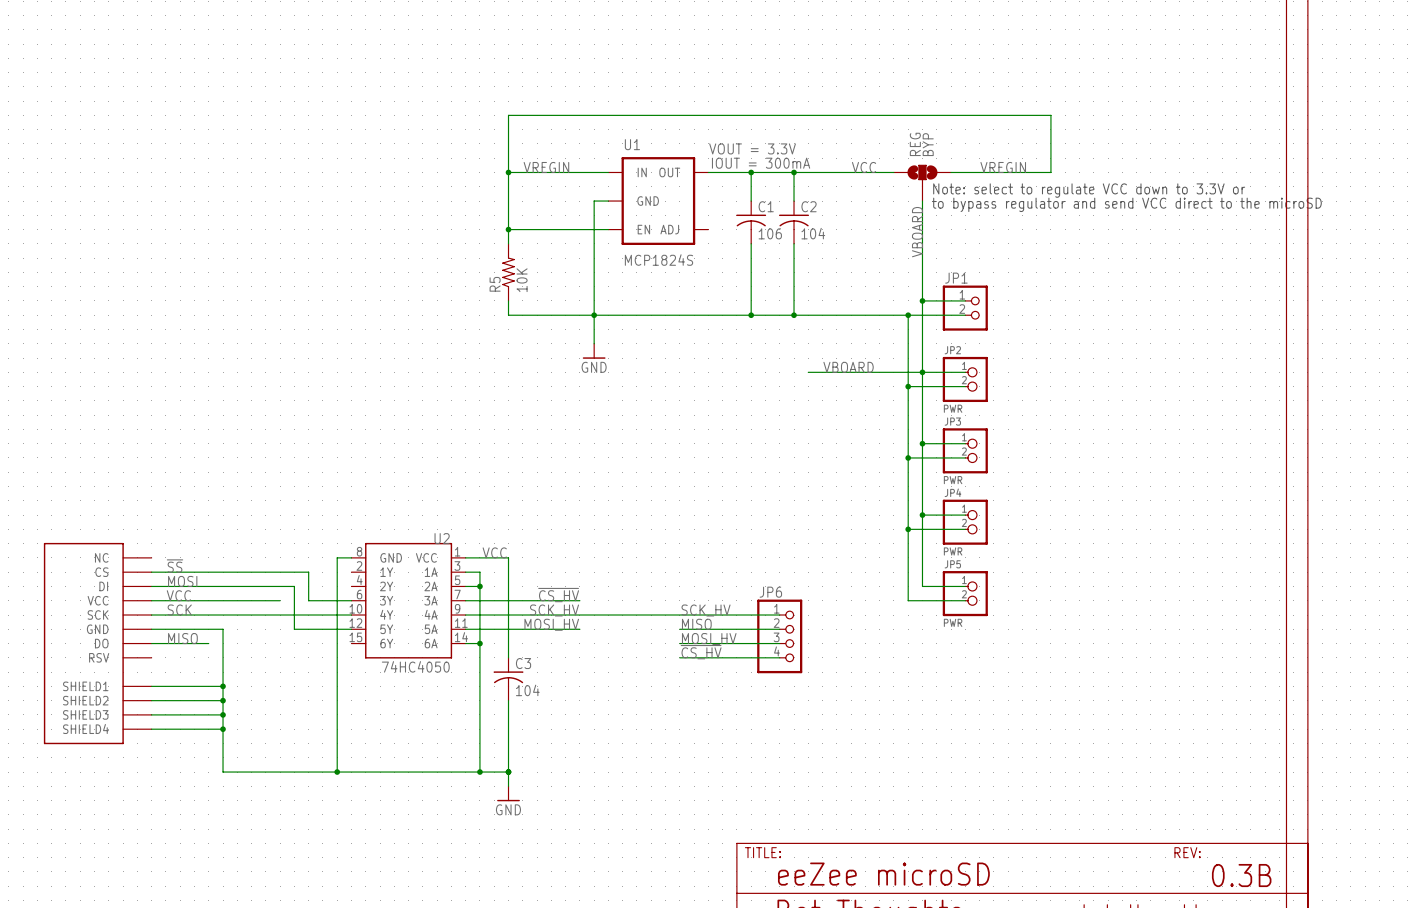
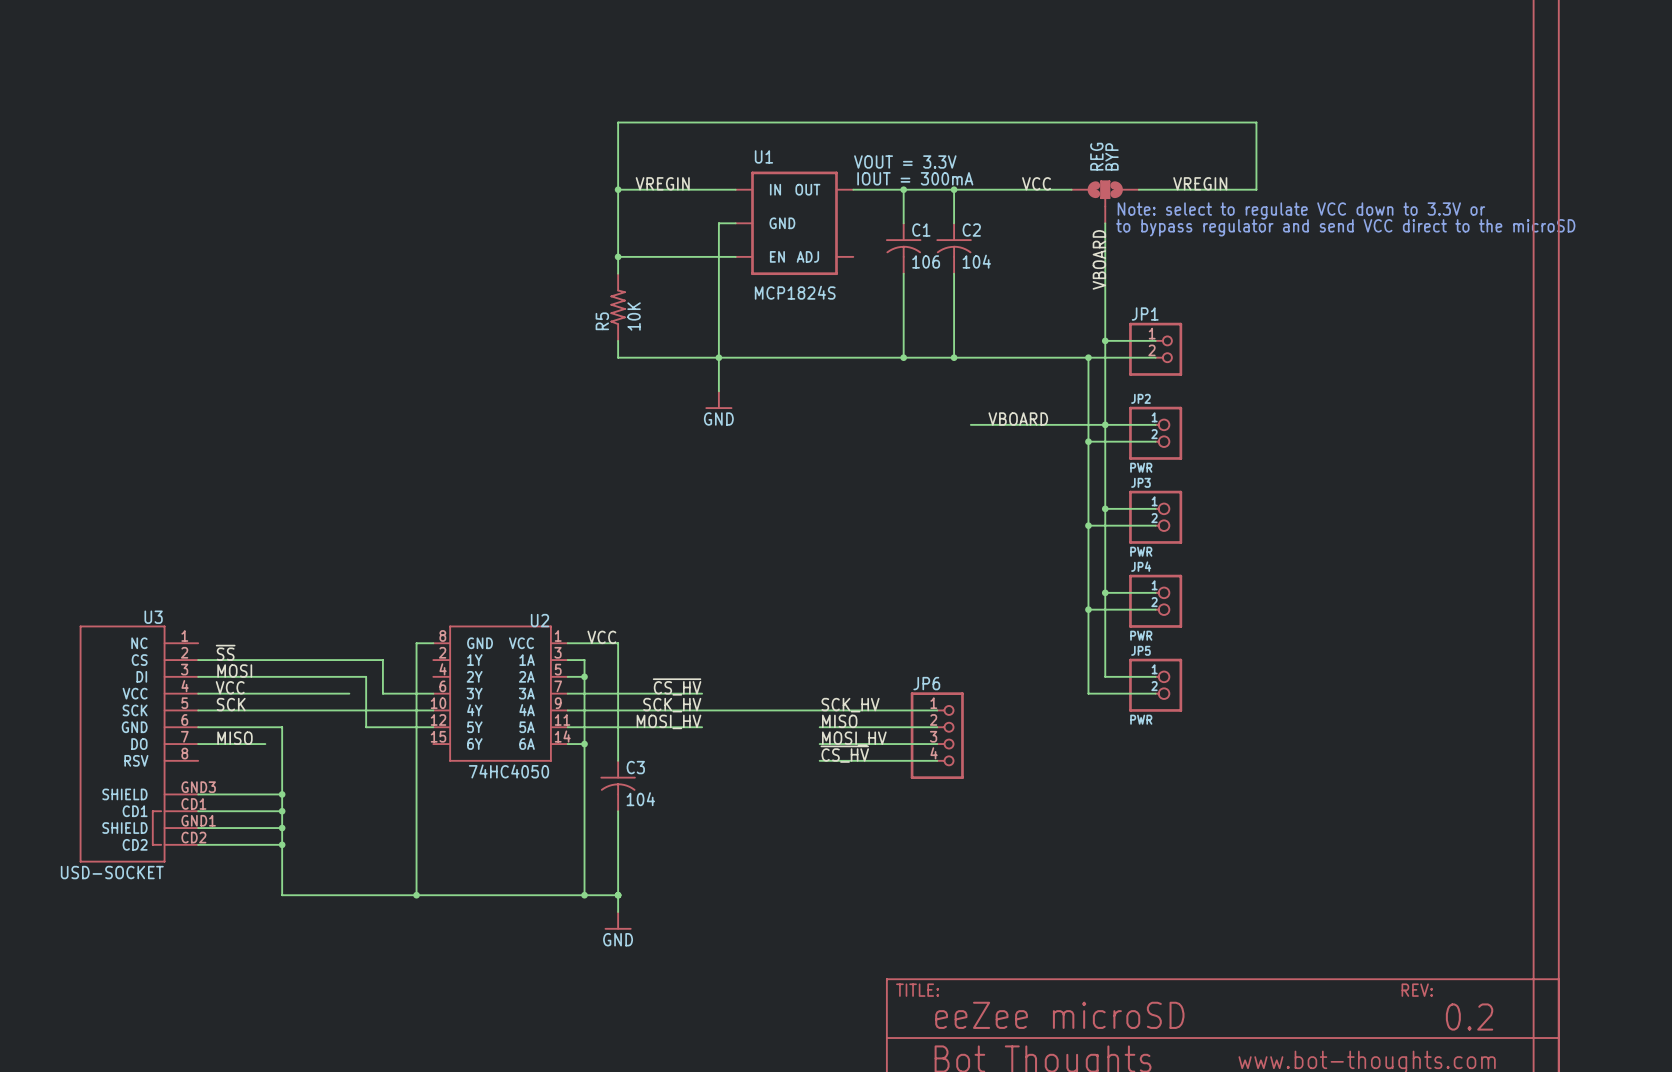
part: (97, 643) -> none
U3: none -> USD-SOCKET (138, 744)
text: 0.3B (1241, 875) -> 0.2 (1469, 1017)

